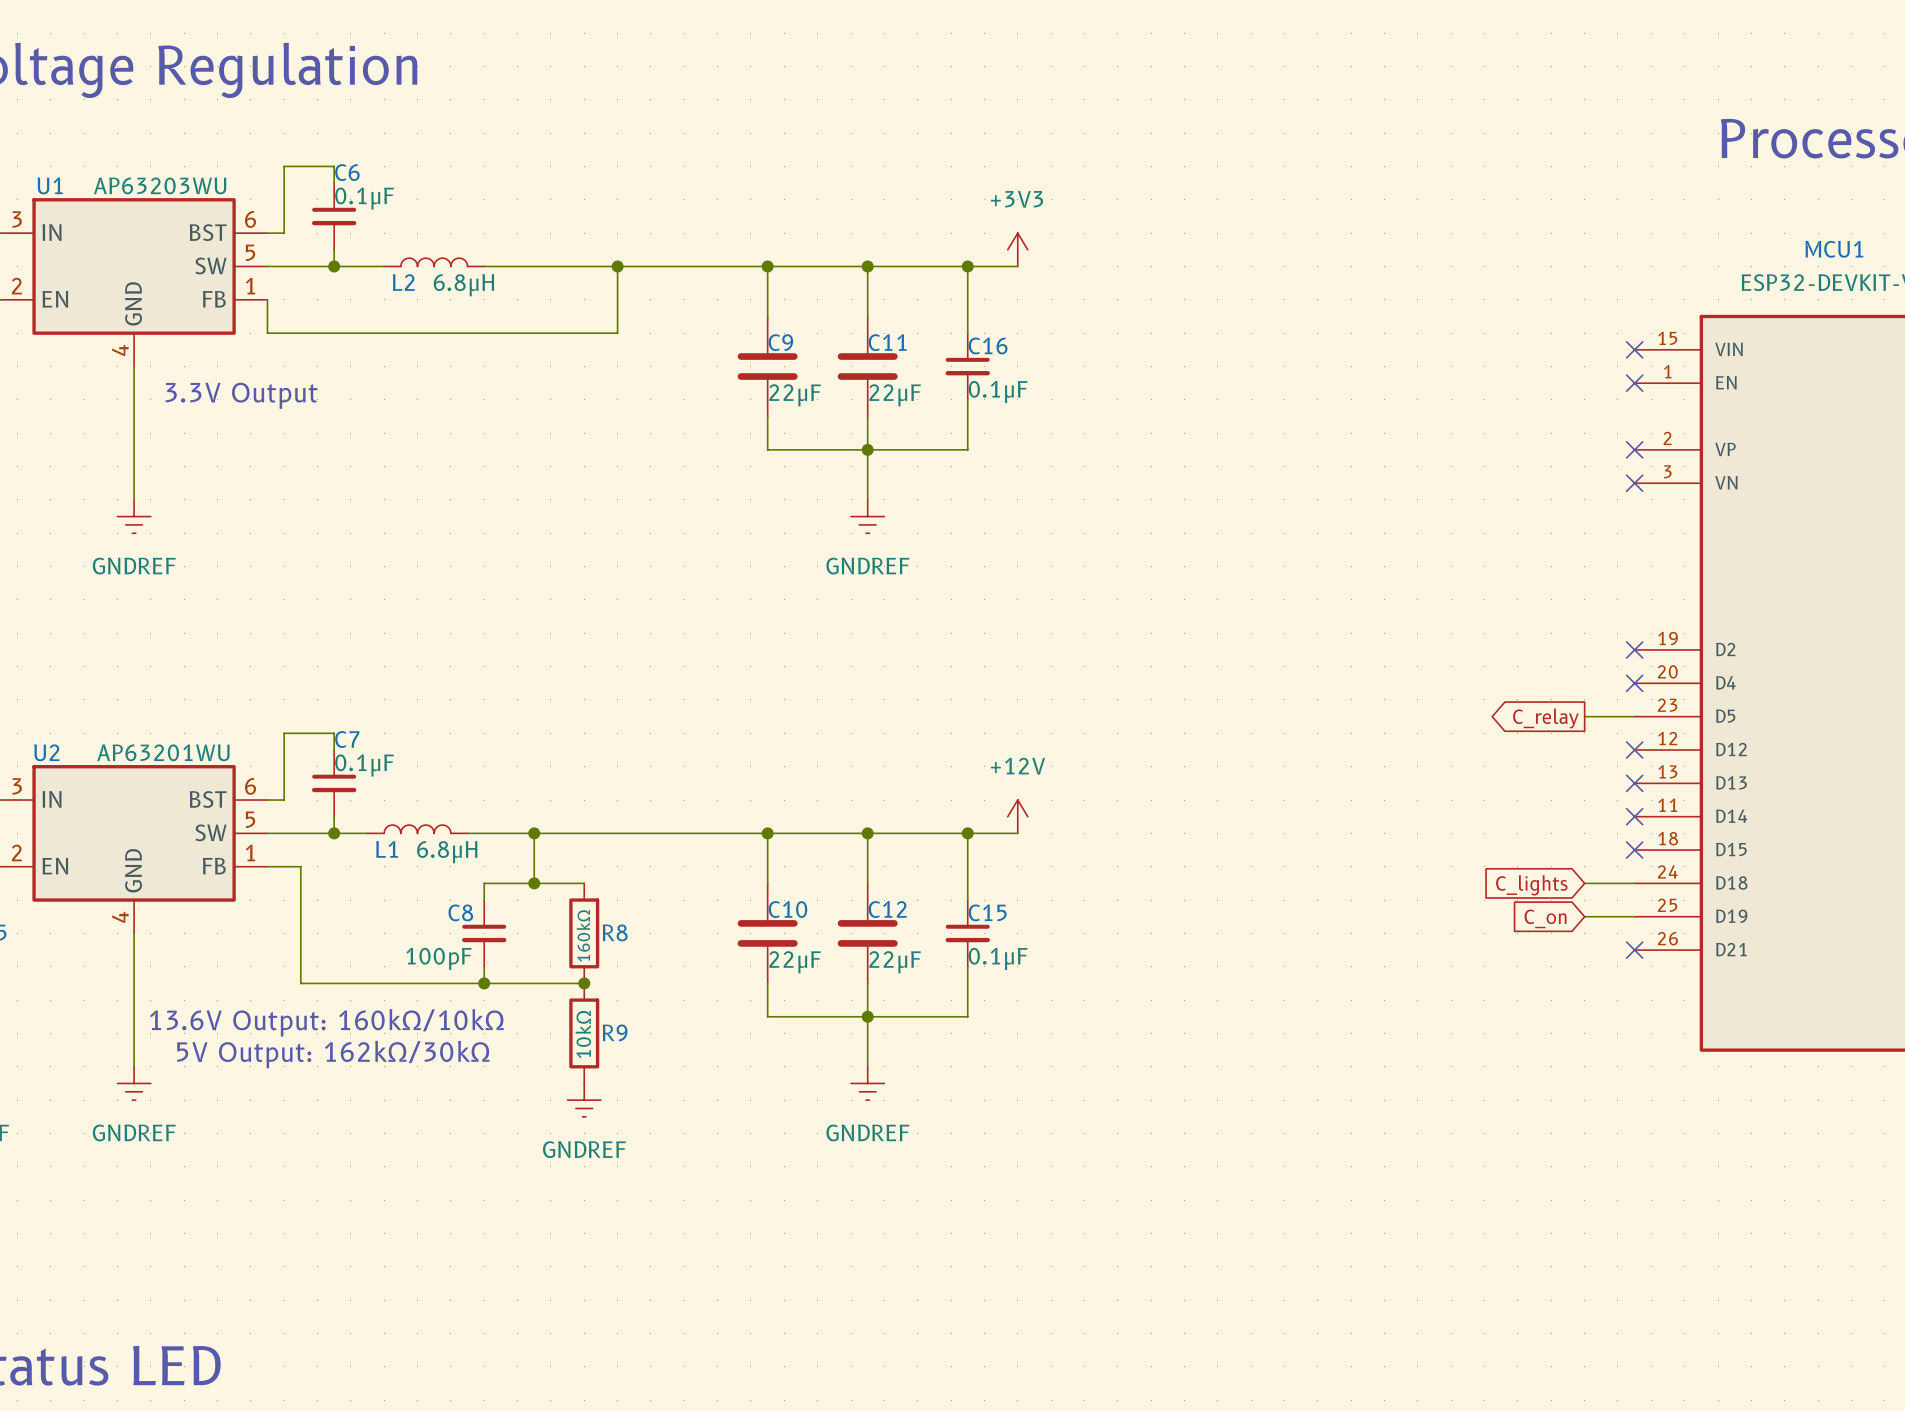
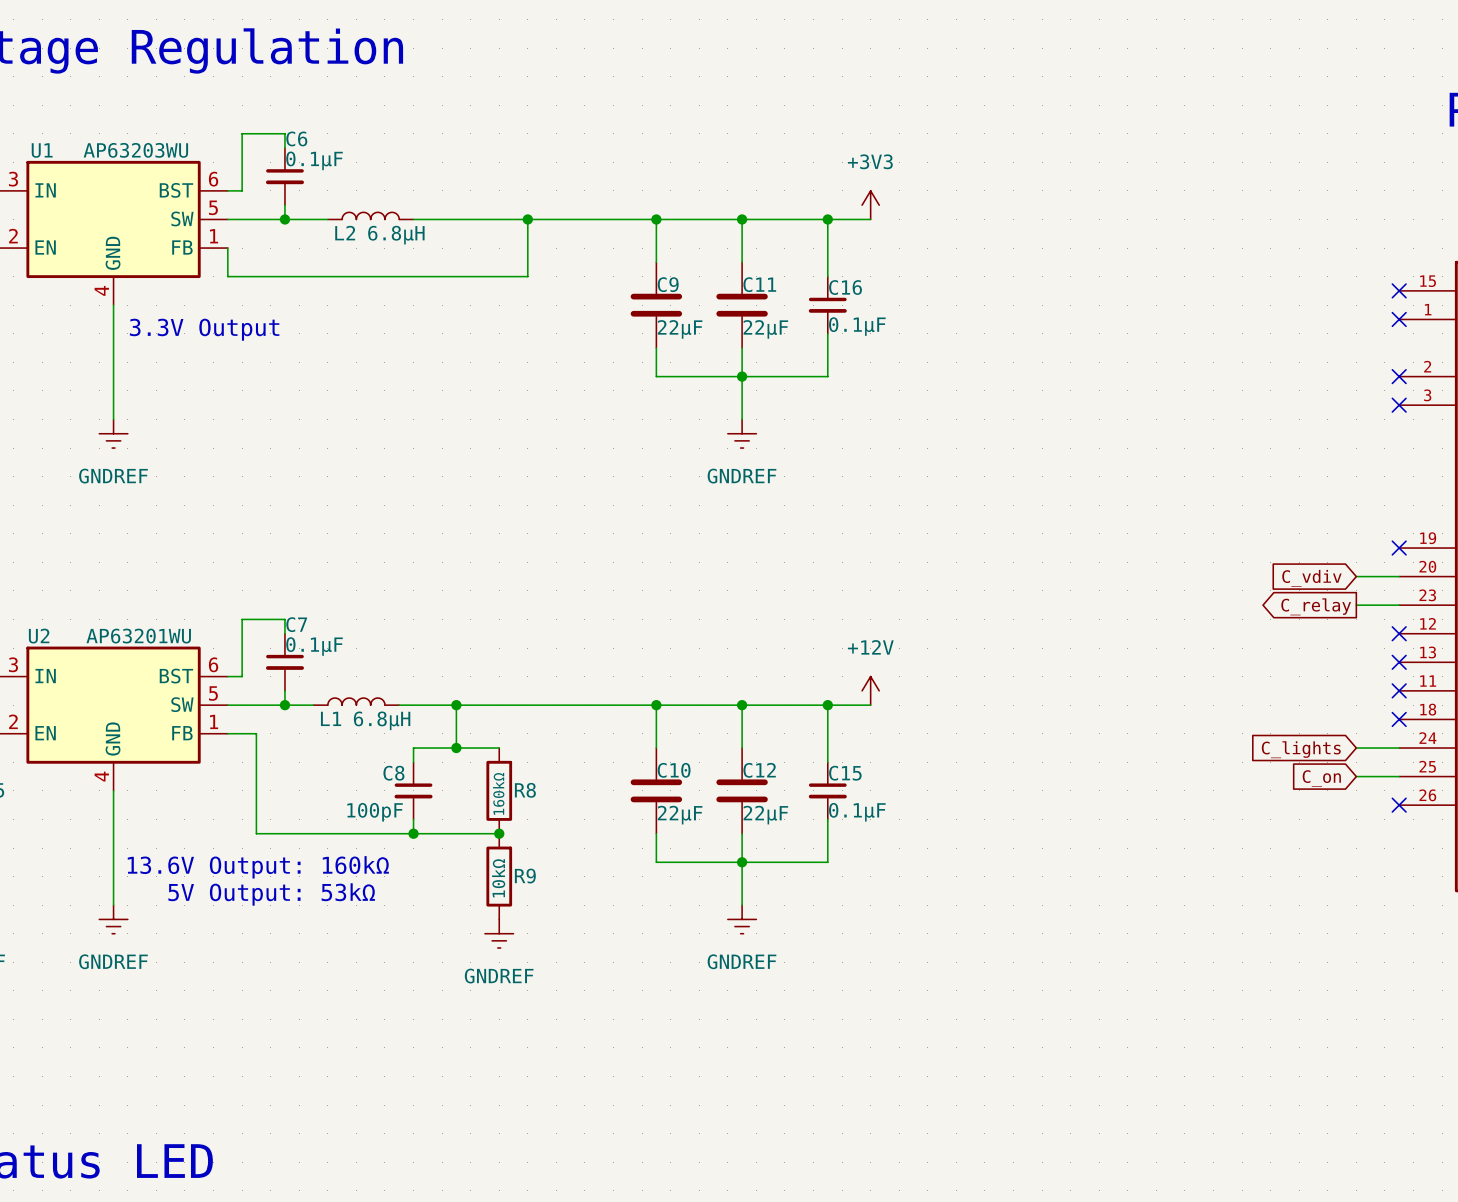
wire: none -> (1356, 576) (1399, 576)
no-connect mark: (1634, 683) -> none
global label: none -> C_vdiv (1311, 578)
text: 13.6V Output: 160kΩ/10kΩ (326, 1022) -> 13.6V Output: 160kΩ (258, 867)
text: 5V Output: 162kΩ/30kΩ (333, 1054) -> 5V Output: 53kΩ (271, 894)

